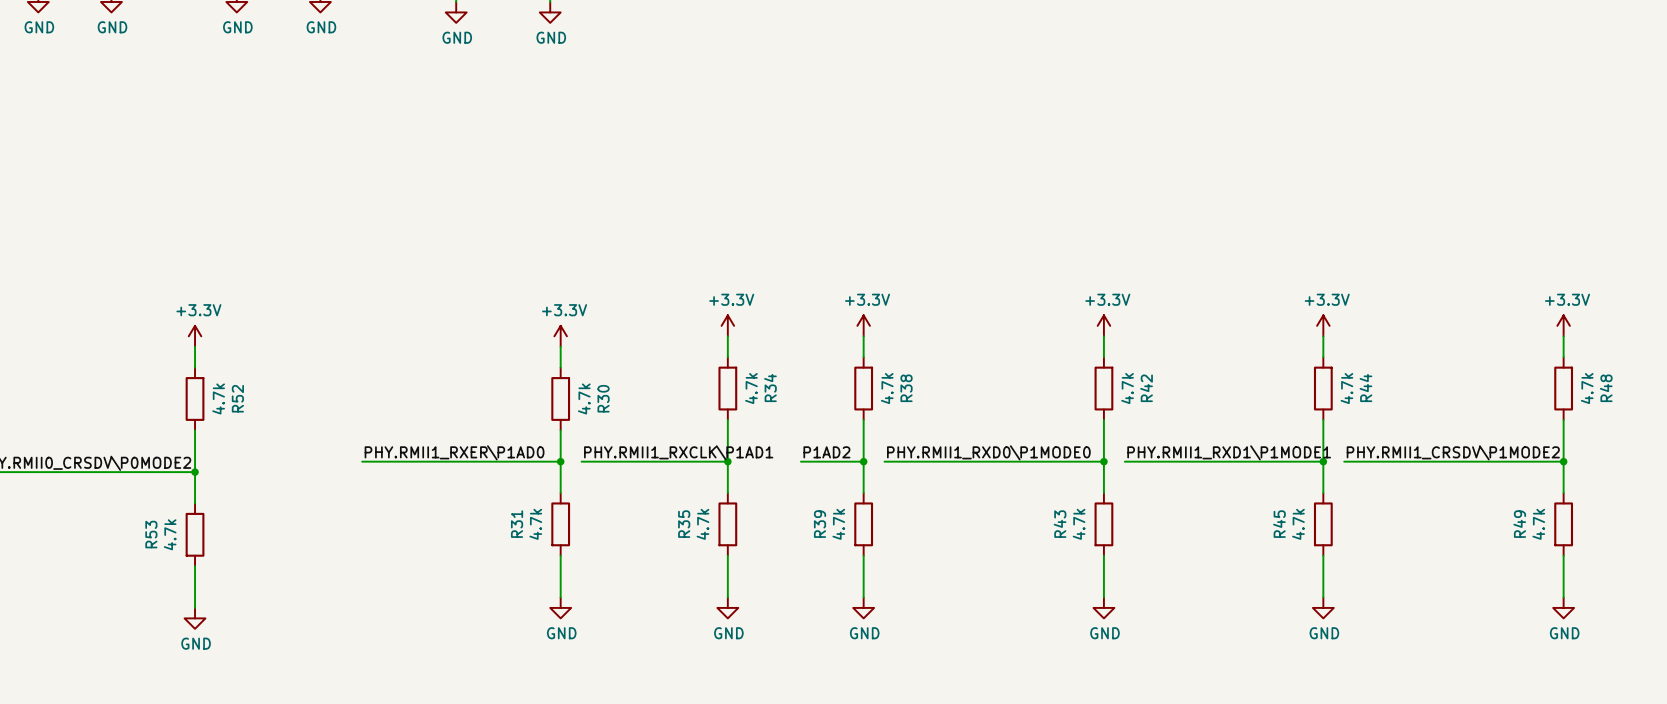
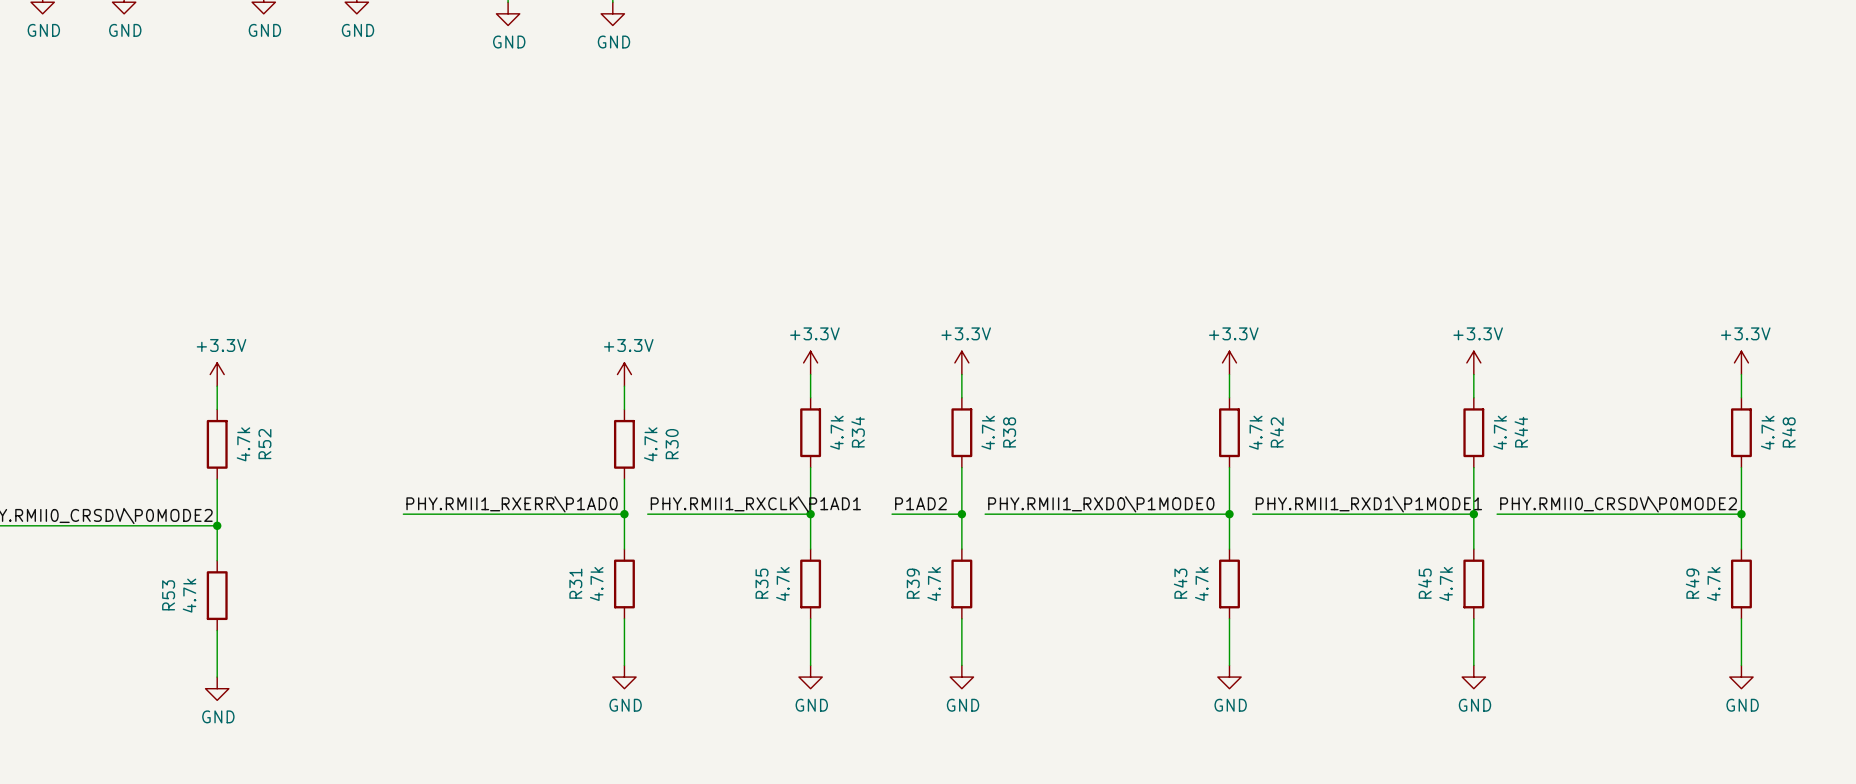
label: PHY.RMII1_RXER\P1AD0 (454, 452) -> PHY.RMII1_RXERR\P1AD0 (512, 504)
label: PHY.RMII1_CRSDV\P1MODE2 (1453, 452) -> PHY.RMII0_CRSDV\P0MODE2 (1618, 504)

